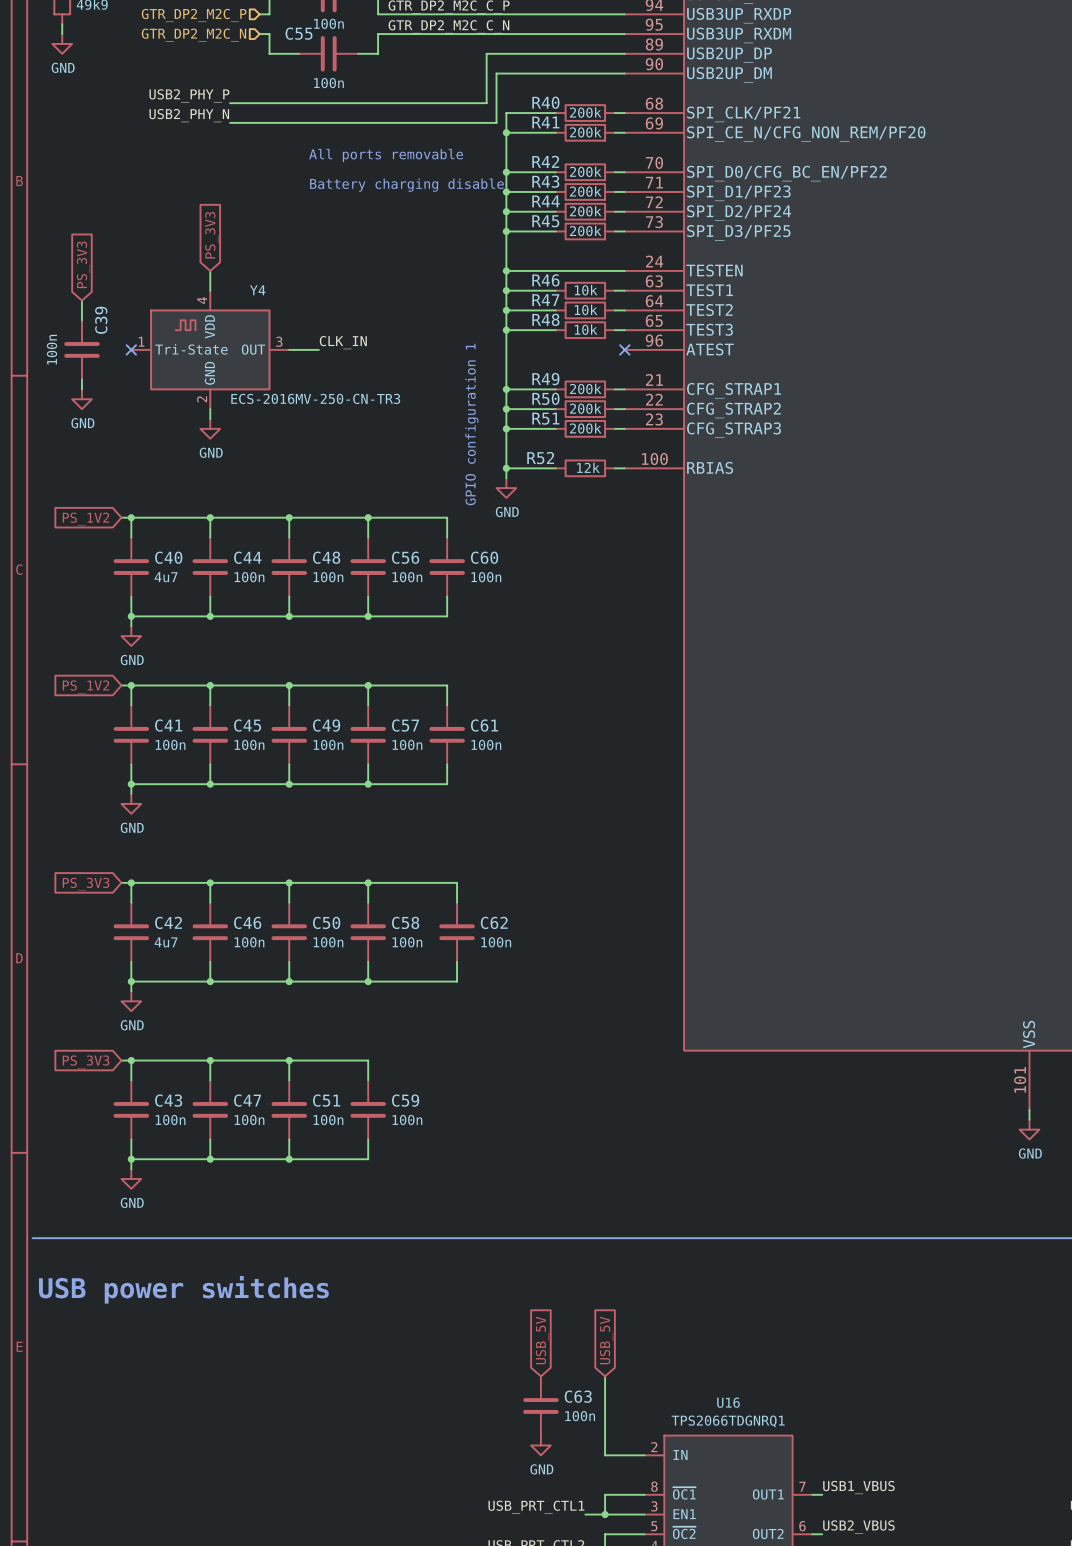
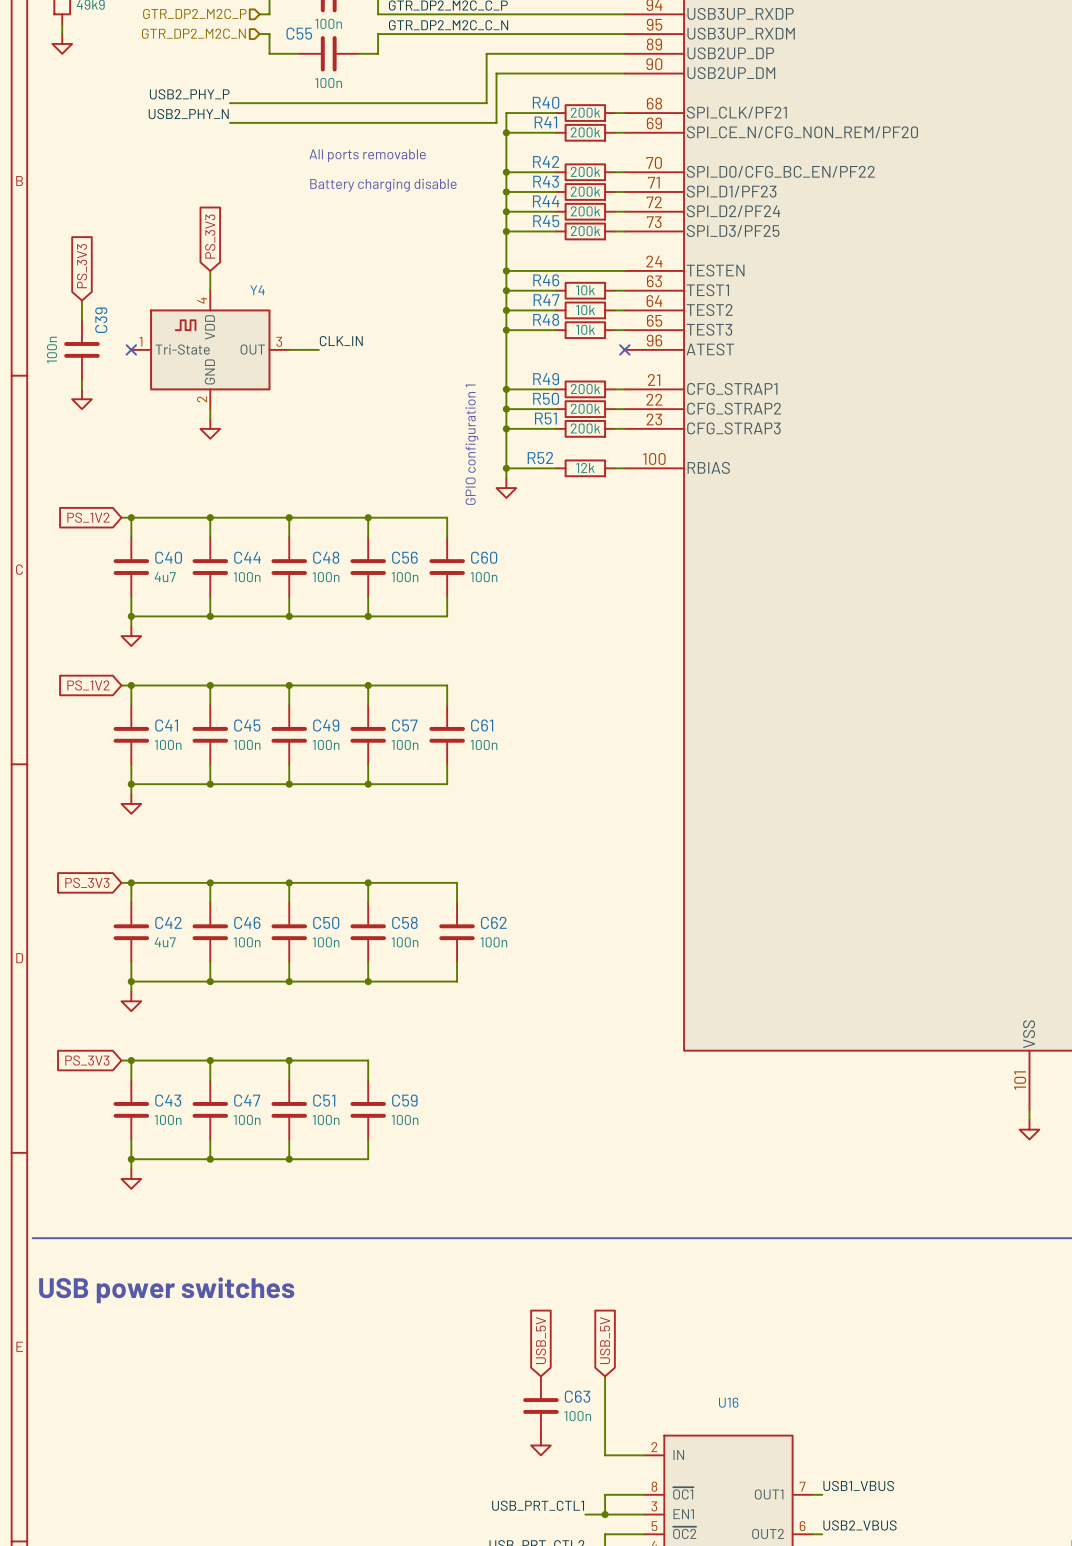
power symbol text: GND (63, 67) -> none
Y4 value: ECS-2016MV-250-CN-TR3 (315, 398) -> none
power symbol text: GND (82, 423) -> none
power symbol text: GND (211, 452) -> none
power symbol text: GND (507, 512) -> none
power symbol text: GND (132, 660) -> none
power symbol text: GND (132, 827) -> none
power symbol text: GND (132, 1025) -> none
power symbol text: GND (1030, 1153) -> none
power symbol text: GND (132, 1202) -> none
U16 value: TPS2066TDGNRQ1 (728, 1421) -> none
power symbol text: GND (541, 1469) -> none

